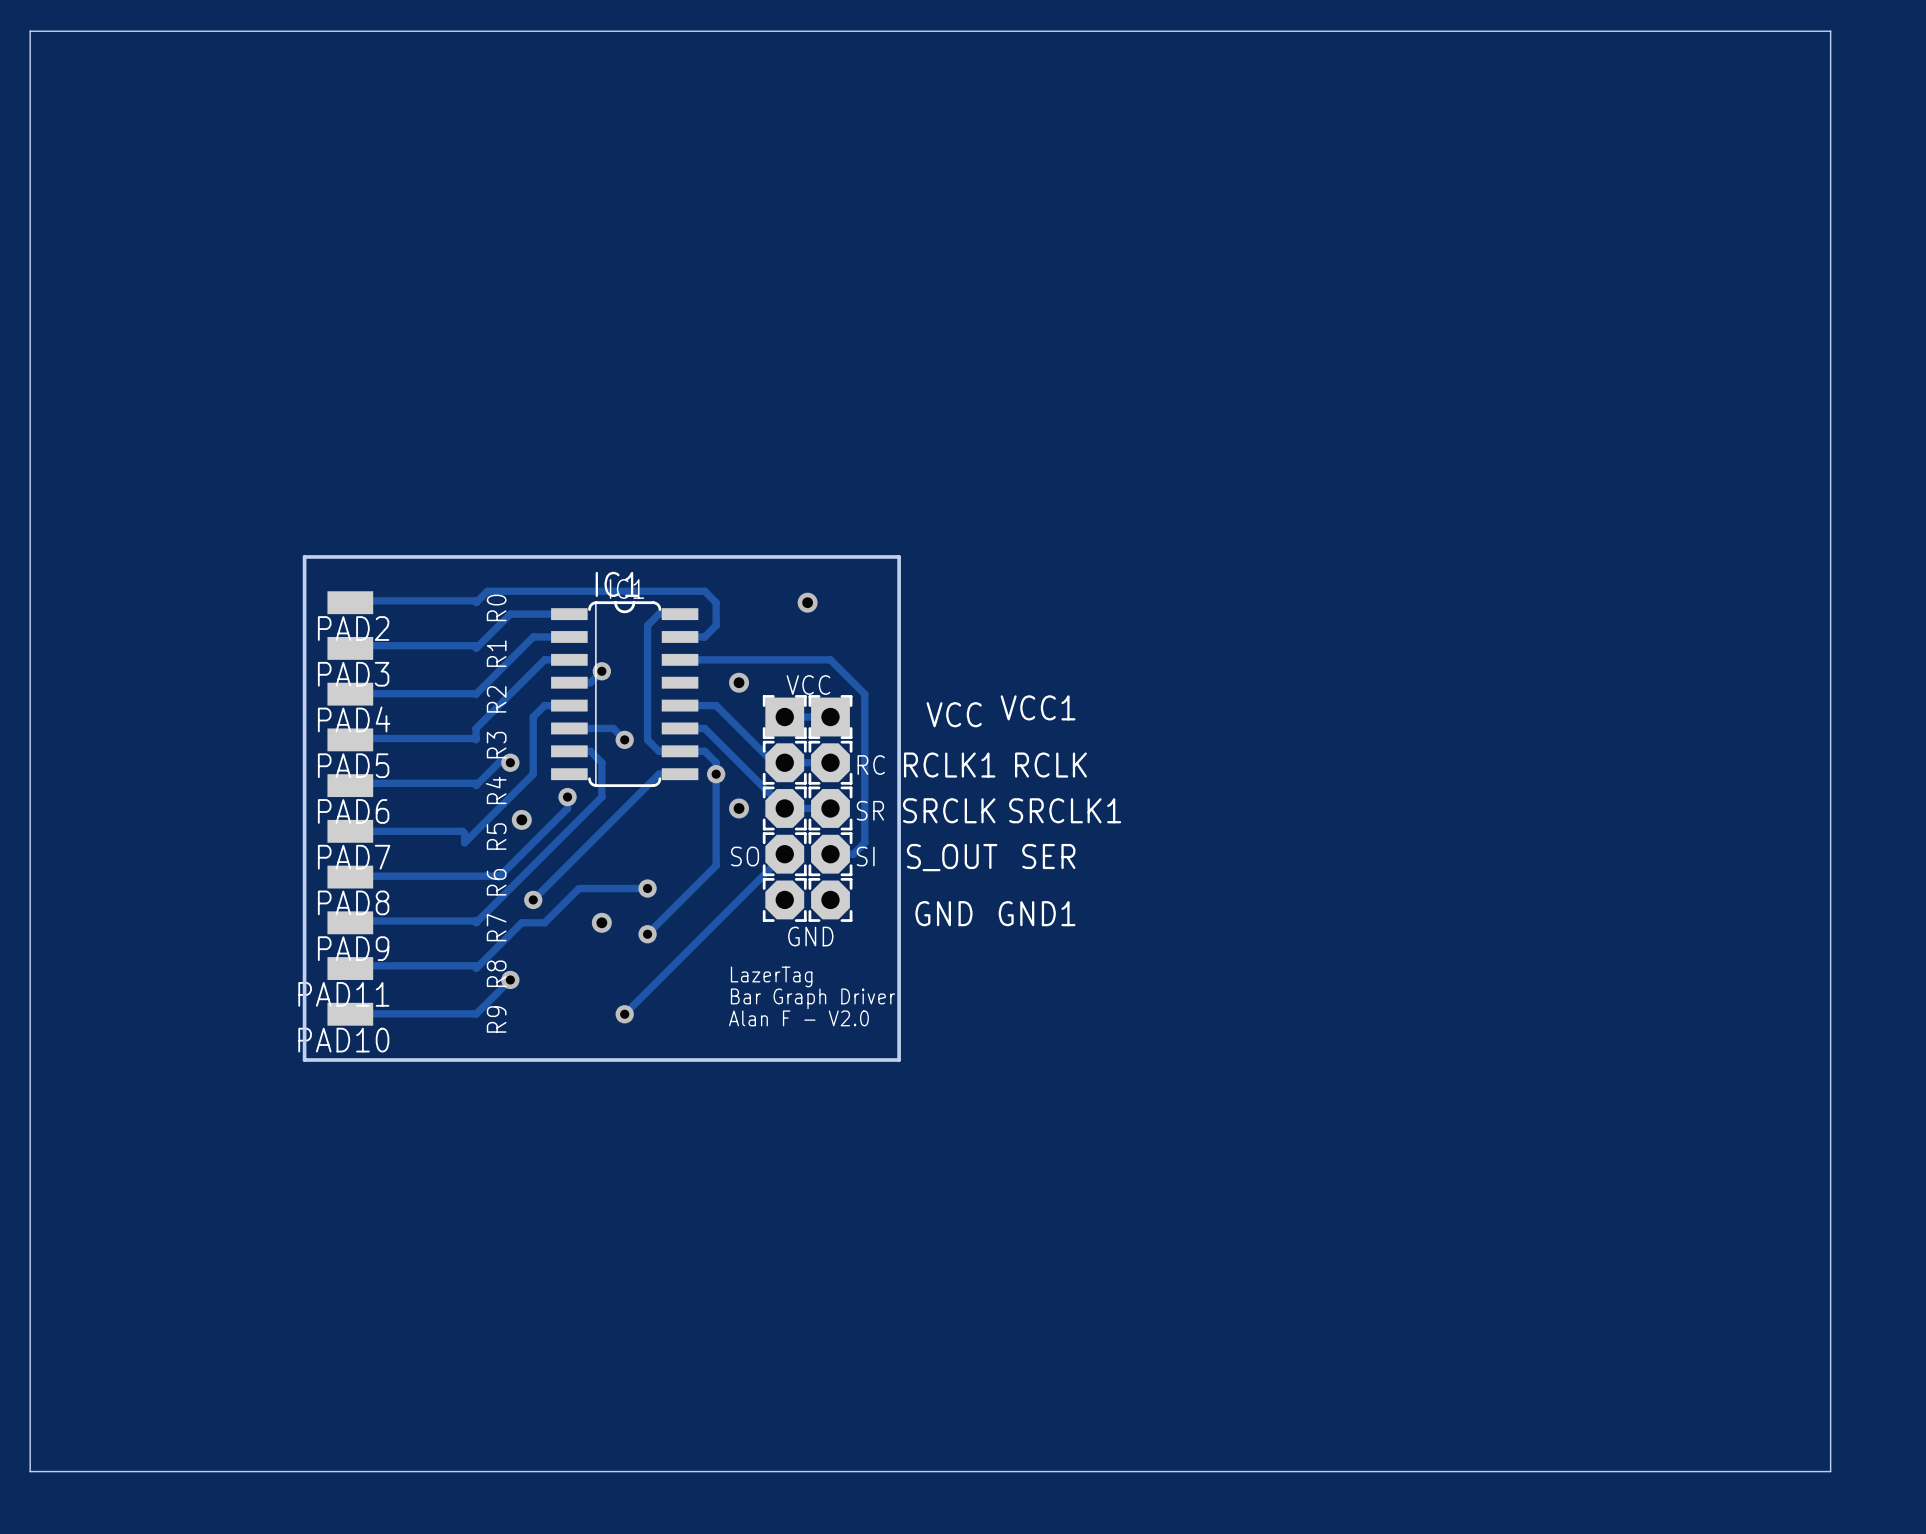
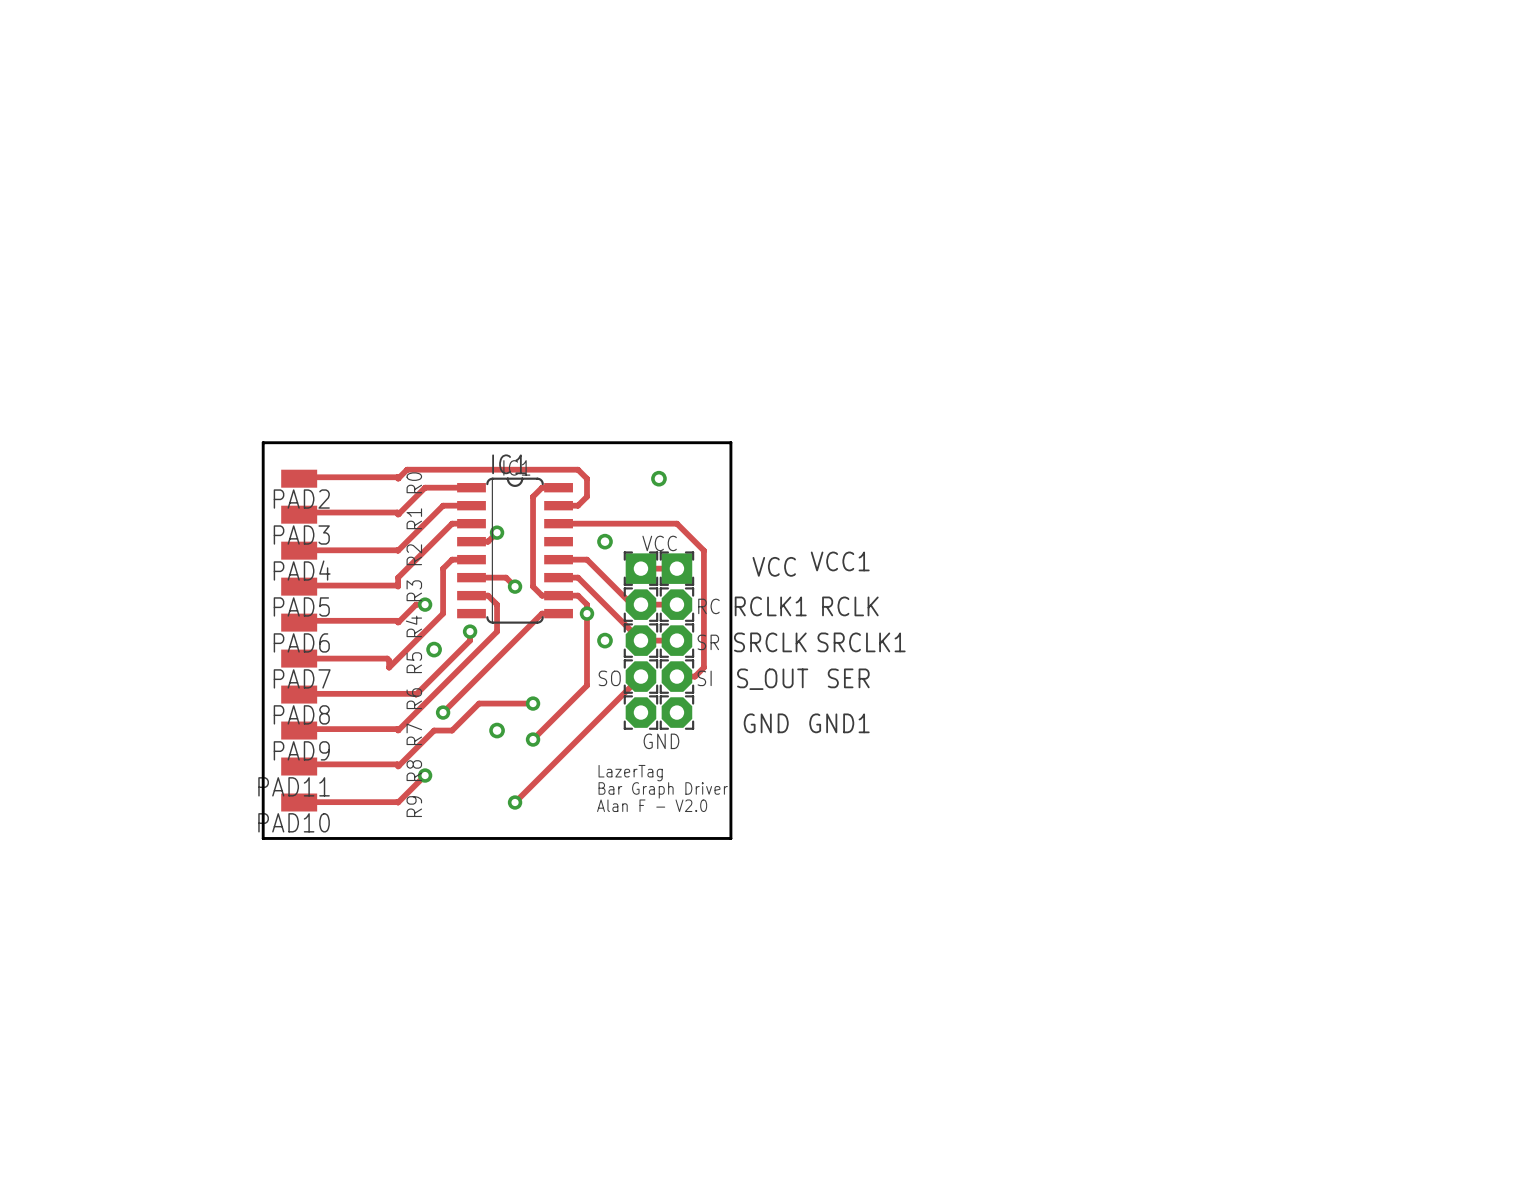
board edge: (30, 31) (1830, 31) (1830, 1471) (30, 1471) (30, 31) -> none

